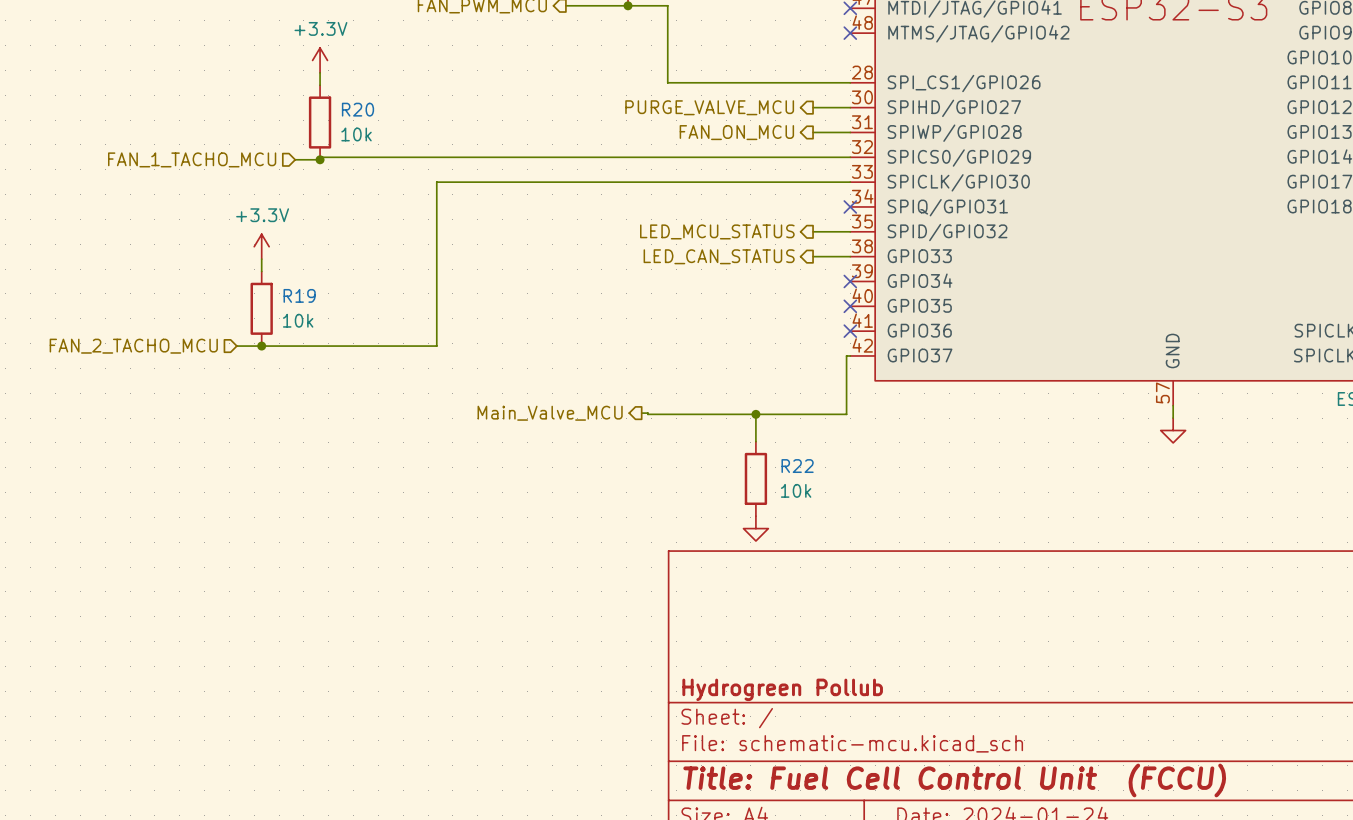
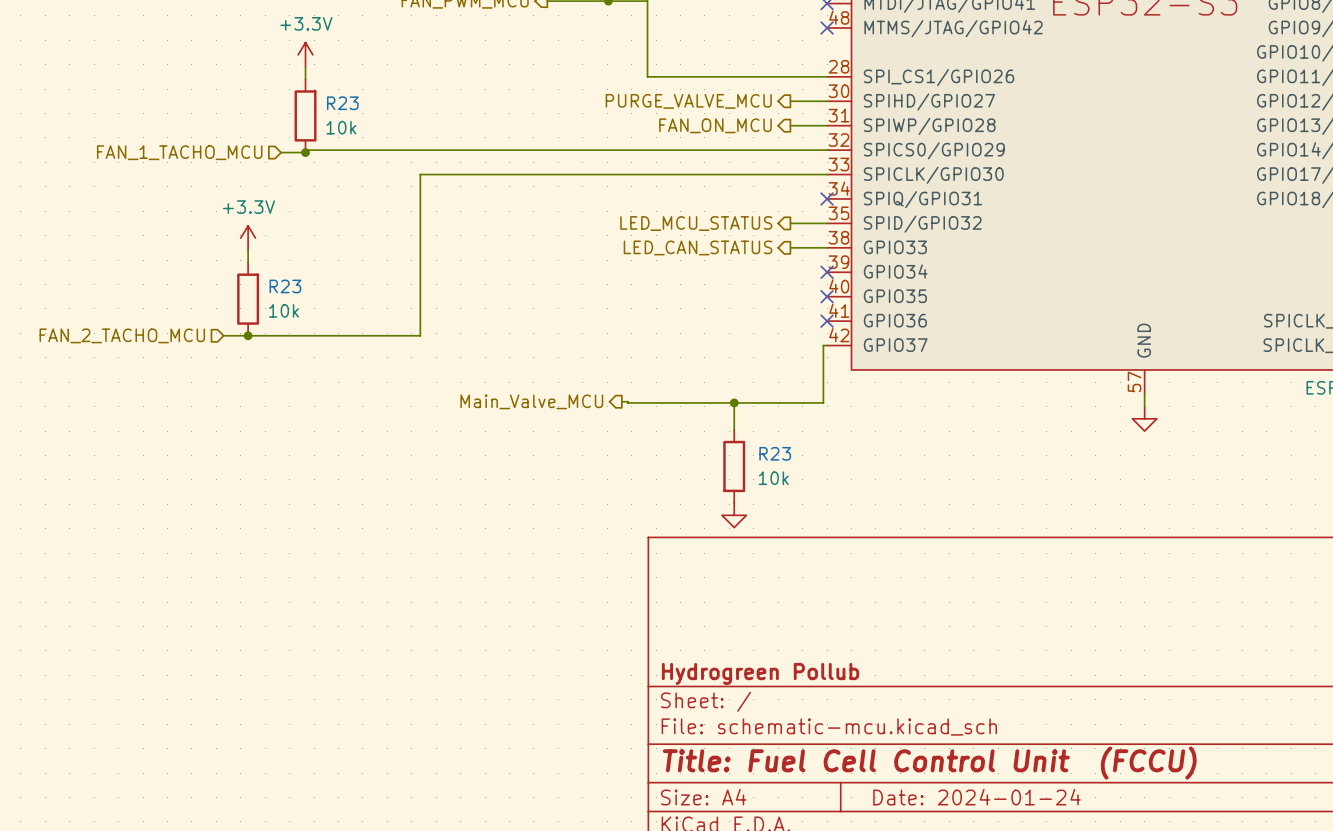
R20 name: R20 (357, 109) -> R23 (342, 103)
R19 name: R19 (299, 295) -> R23 (285, 286)
R22 name: R22 (797, 466) -> R23 (775, 453)

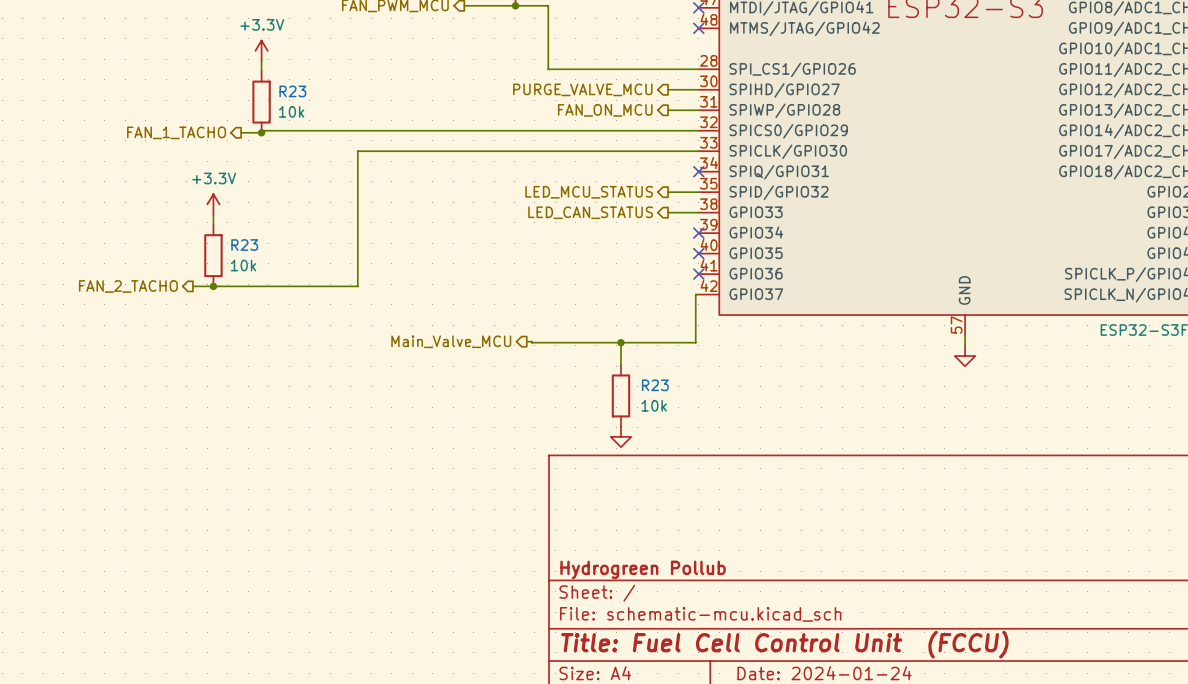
hierarchical label shape: input (179, 152) -> output (176, 132)
hierarchical label: FAN_1_TACHO_MCU (179, 152) -> FAN_1_TACHO (176, 132)
hierarchical label shape: input (122, 335) -> output (128, 286)
hierarchical label: FAN_2_TACHO_MCU (122, 335) -> FAN_2_TACHO (128, 286)

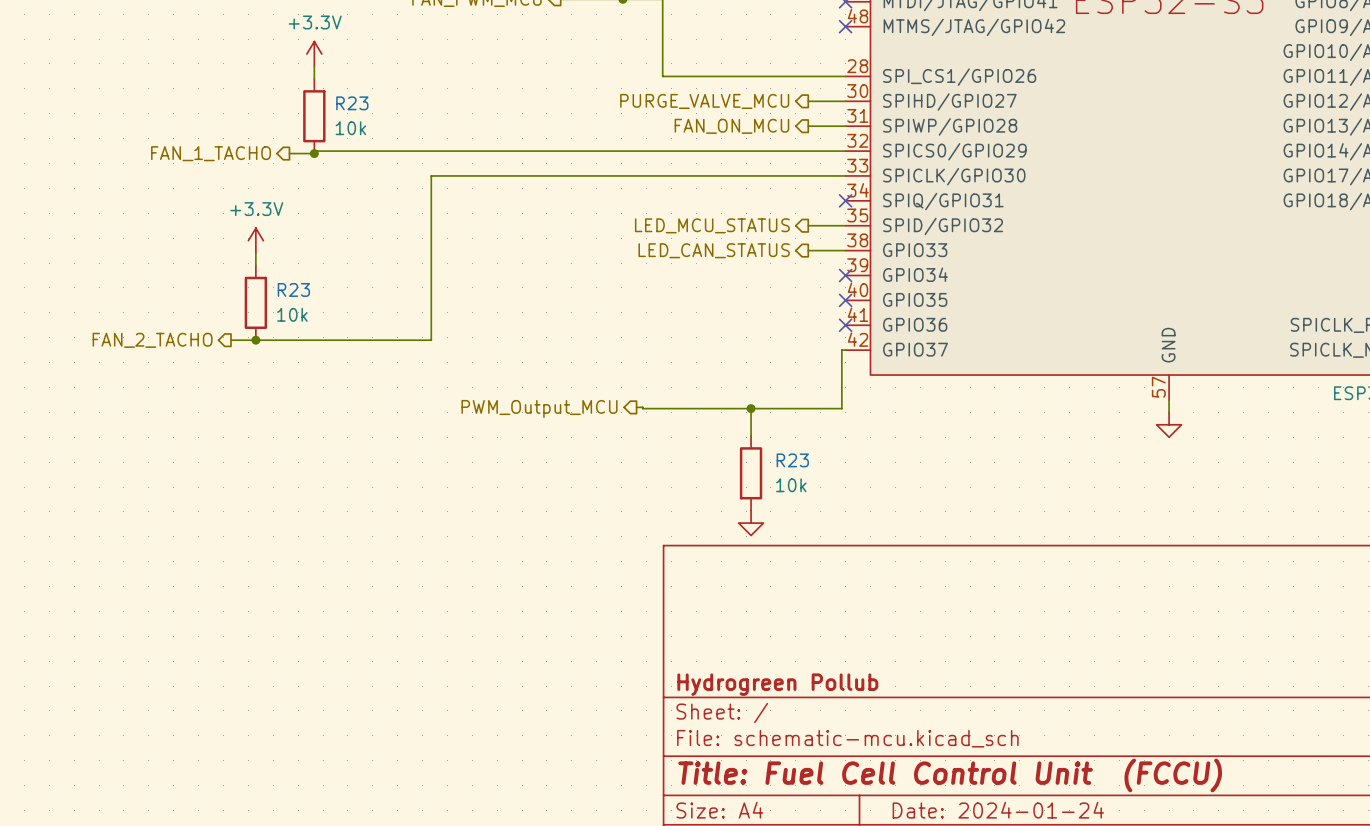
hierarchical label: Main_Valve_MCU (451, 341) -> PWM_Output_MCU (539, 408)

